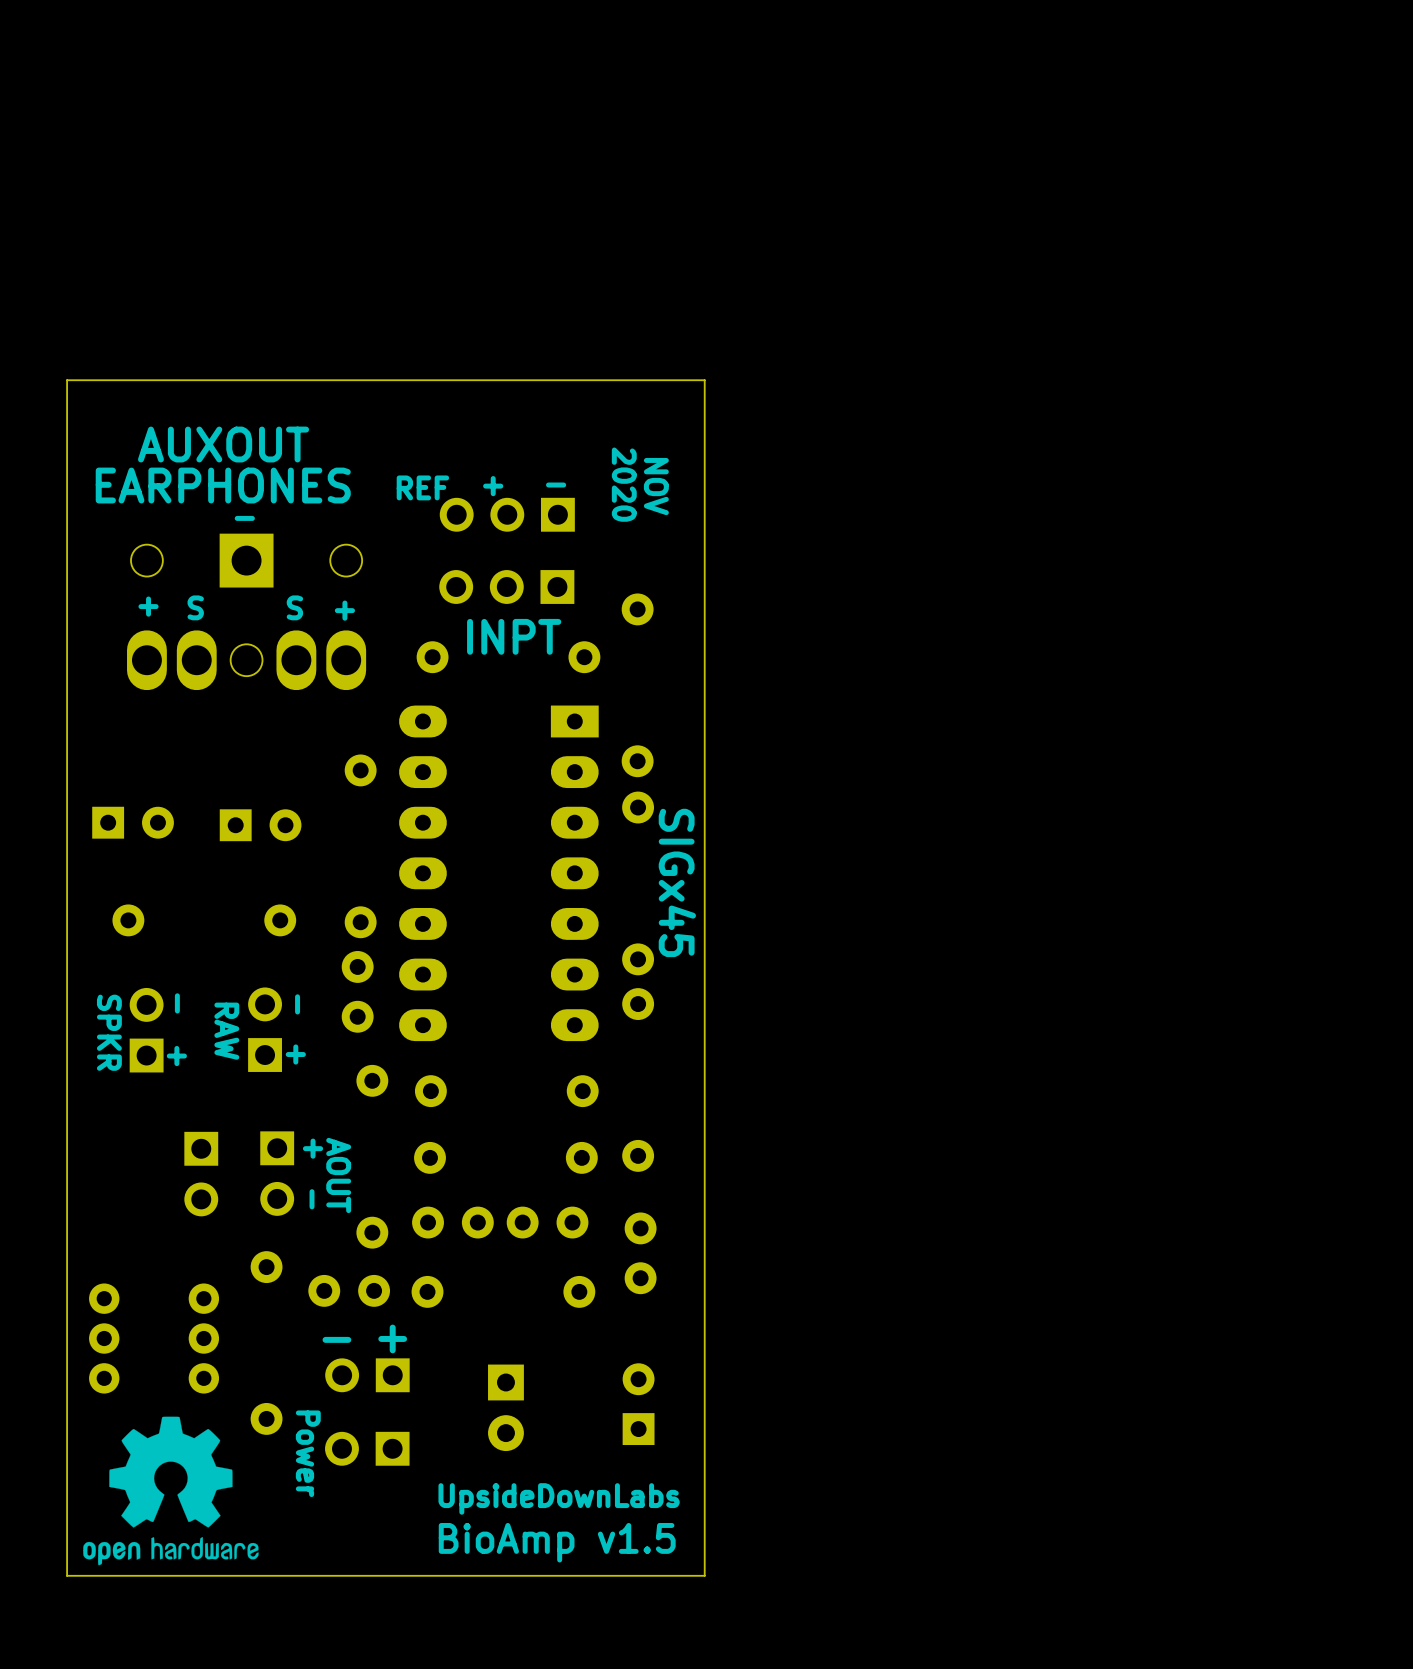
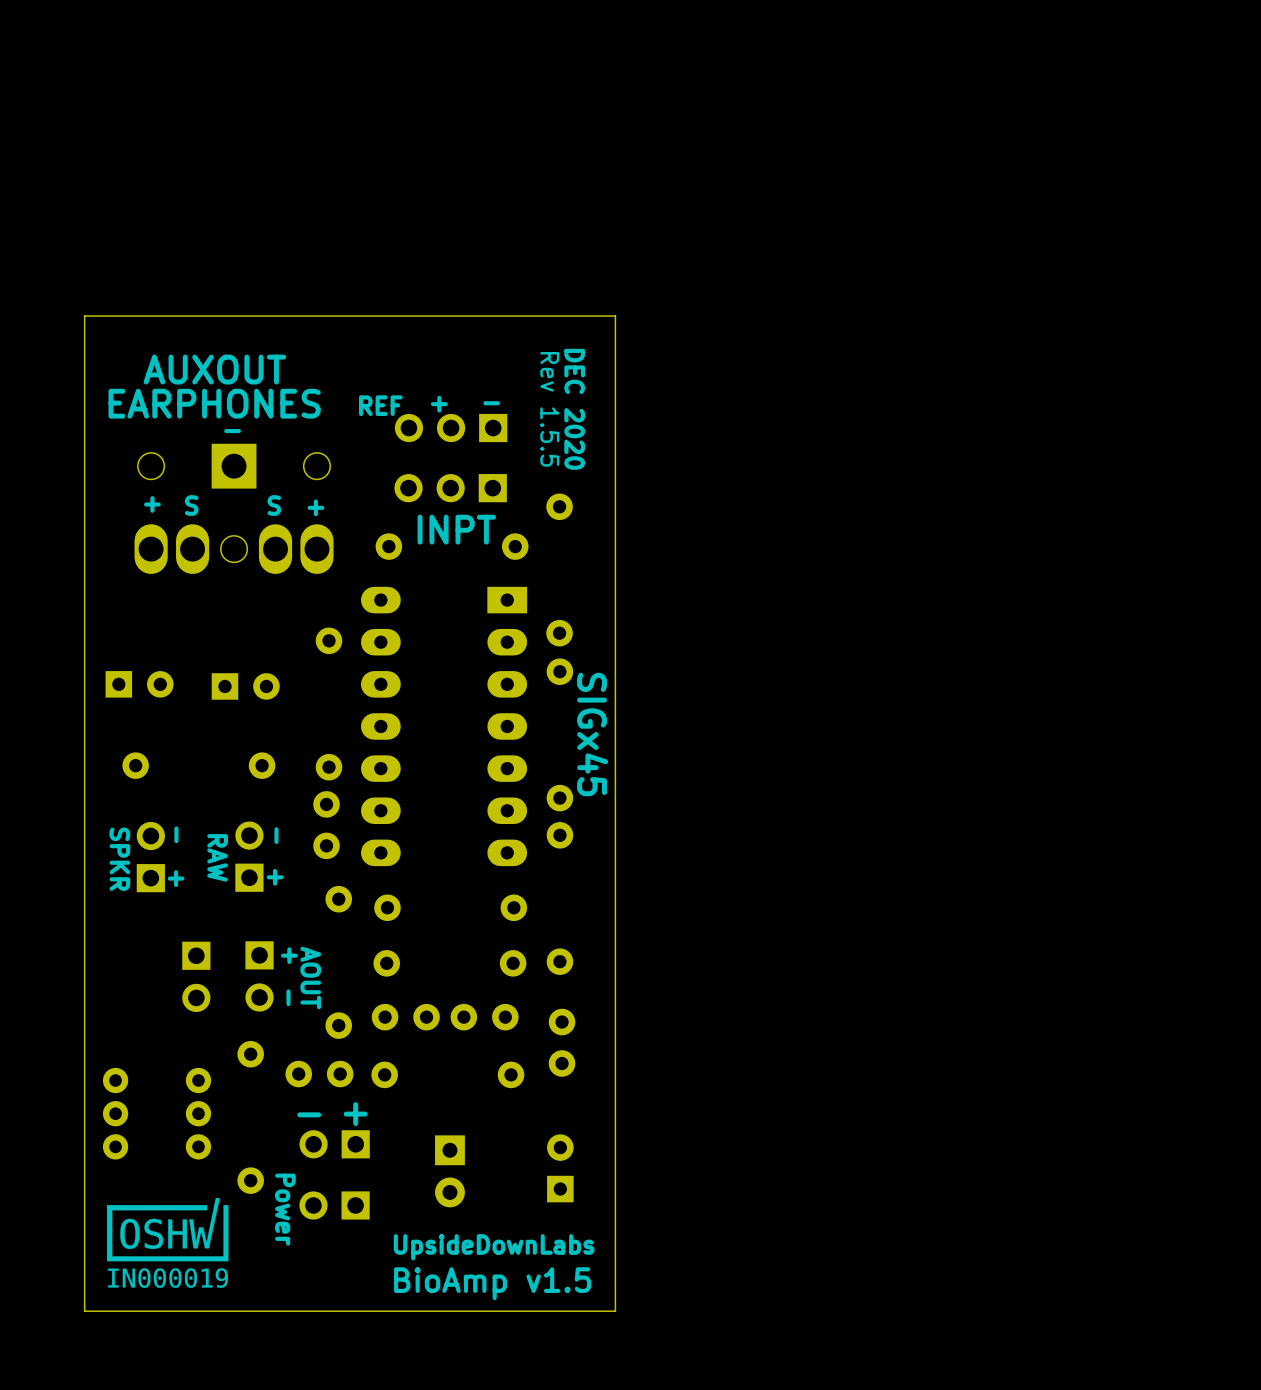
text: 2020 (624, 484) -> Rev 1.5.5 (549, 409)
text: NOV (656, 486) -> DEC 2020 (574, 409)
drawing shape: [83, 1416, 259, 1566] -> [106, 1197, 229, 1288]

